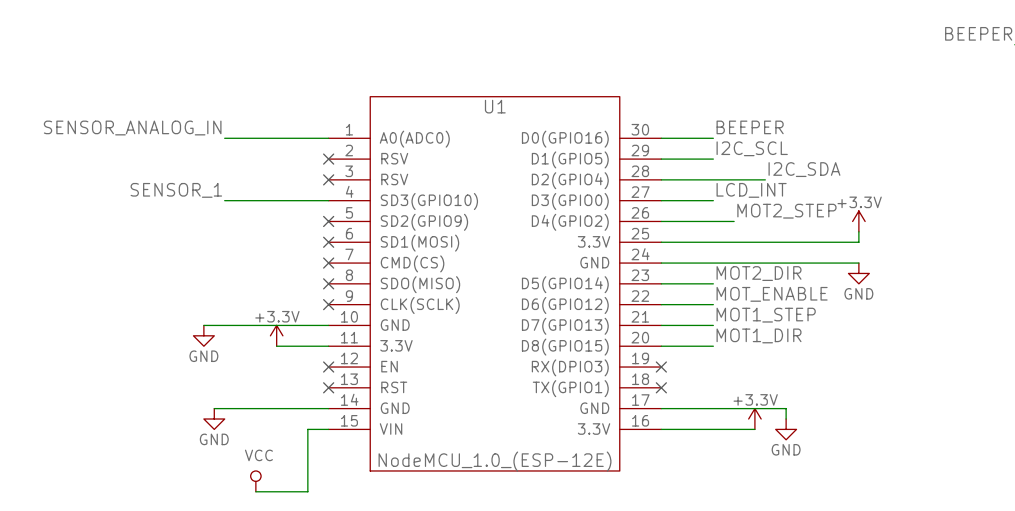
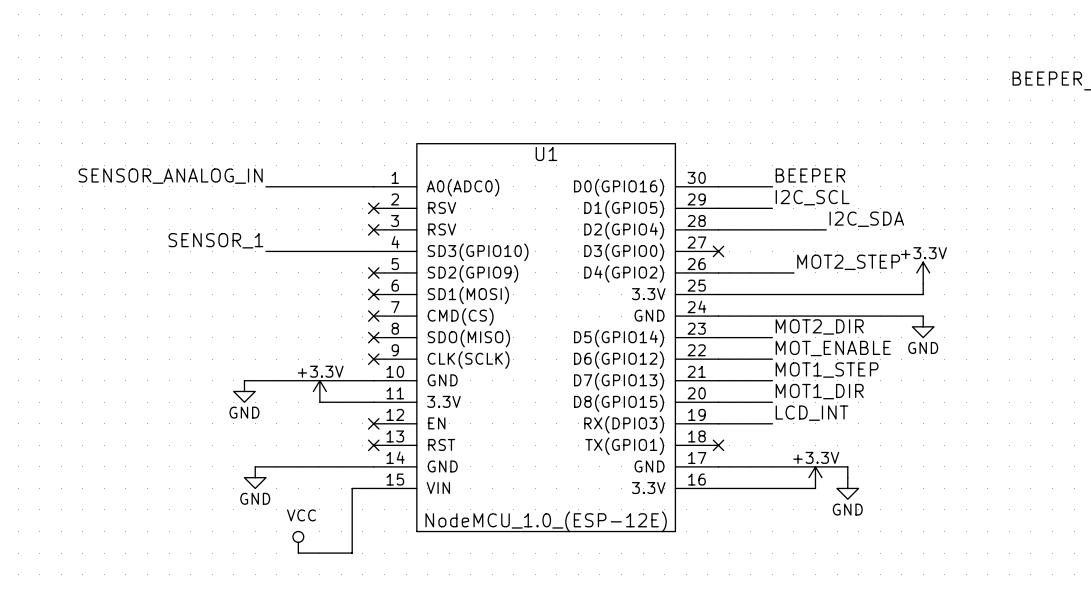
label position: LCD_INT (751, 190) -> LCD_INT (812, 413)
wire: (661, 200) (713, 200) -> (718, 423) (772, 423)
no-connect mark: none -> (718, 251)
no-connect mark: (661, 367) -> none

